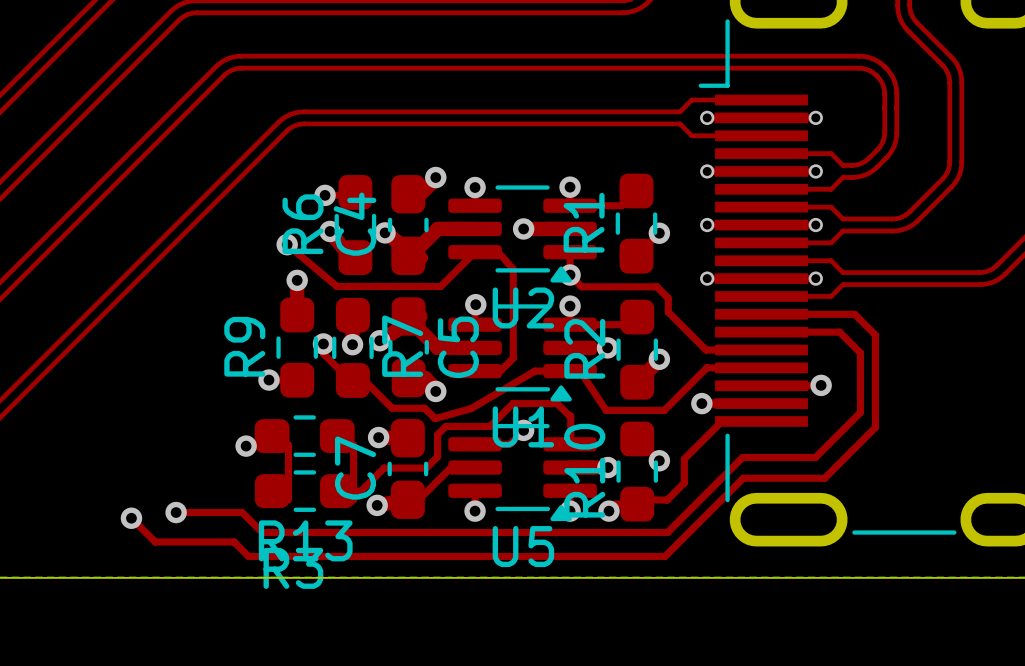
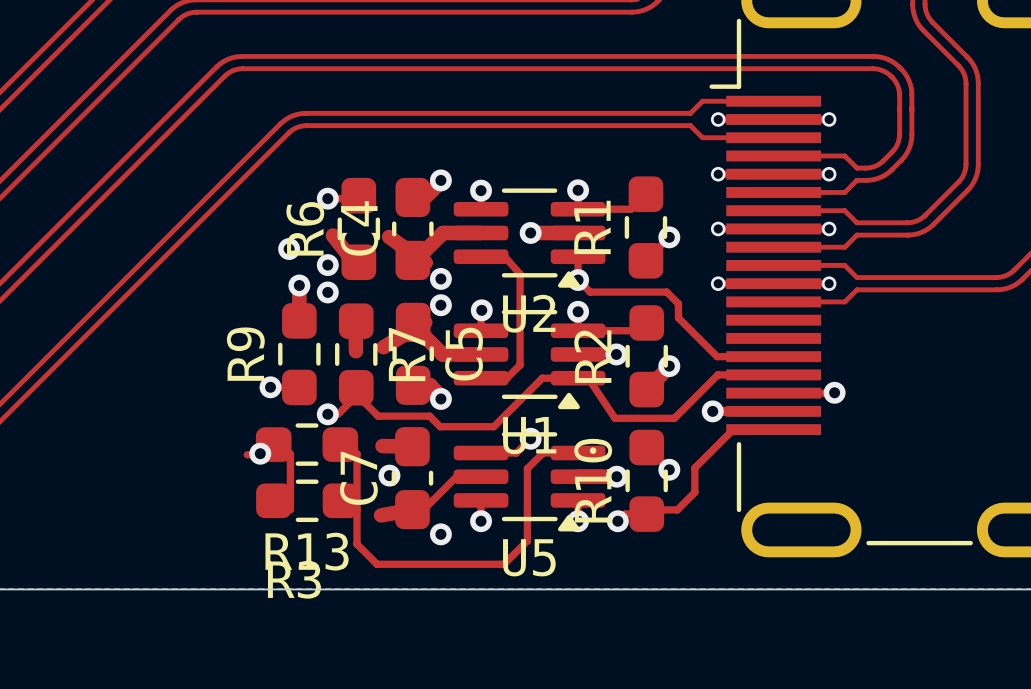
via: (330, 231) -> none
via: (385, 232) -> none
top track: (287, 244) (336, 286) (440, 286) (475, 252) -> none
via: none -> (327, 265)
via: none -> (440, 278)
via: none -> (327, 292)
via: none -> (440, 305)
top track: (761, 314) (854, 314) (875, 335) (875, 427) (824, 478) (743, 478) (665, 556) (248, 556) (234, 542) (155, 542) (131, 518) -> none
top track: (761, 332) (839, 332) (860, 352) (860, 412) (815, 457) (742, 457) (667, 532) (262, 532) (242, 512) (176, 512) -> none
via: (379, 340) -> none
top track: (323, 343) (323, 353) (350, 380) (364, 380) (392, 408) -> (356, 394) (378, 416) (396, 416)
via: (323, 343) -> none
via: (352, 344) -> none
top track: (535, 371) (471, 408) (435, 418) -> (542, 378) (493, 426) (440, 426)
top track: none -> (356, 396) (338, 414)
via: none -> (327, 414)
via: (378, 437) -> none
top track: (570, 444) (570, 416) (557, 403) (512, 403) (490, 426) (445, 426) (437, 434) (437, 456) (426, 468) (384, 468) (361, 491) (337, 491) -> (578, 452) (543, 452) (527, 468) (527, 540) (504, 564) (377, 564) (356, 544) (356, 509)
via position: (246, 446) -> (260, 453)
via: none -> (389, 475)
via: (377, 505) -> none
via: (176, 512) -> none
via: (131, 518) -> none
via: none -> (440, 534)

